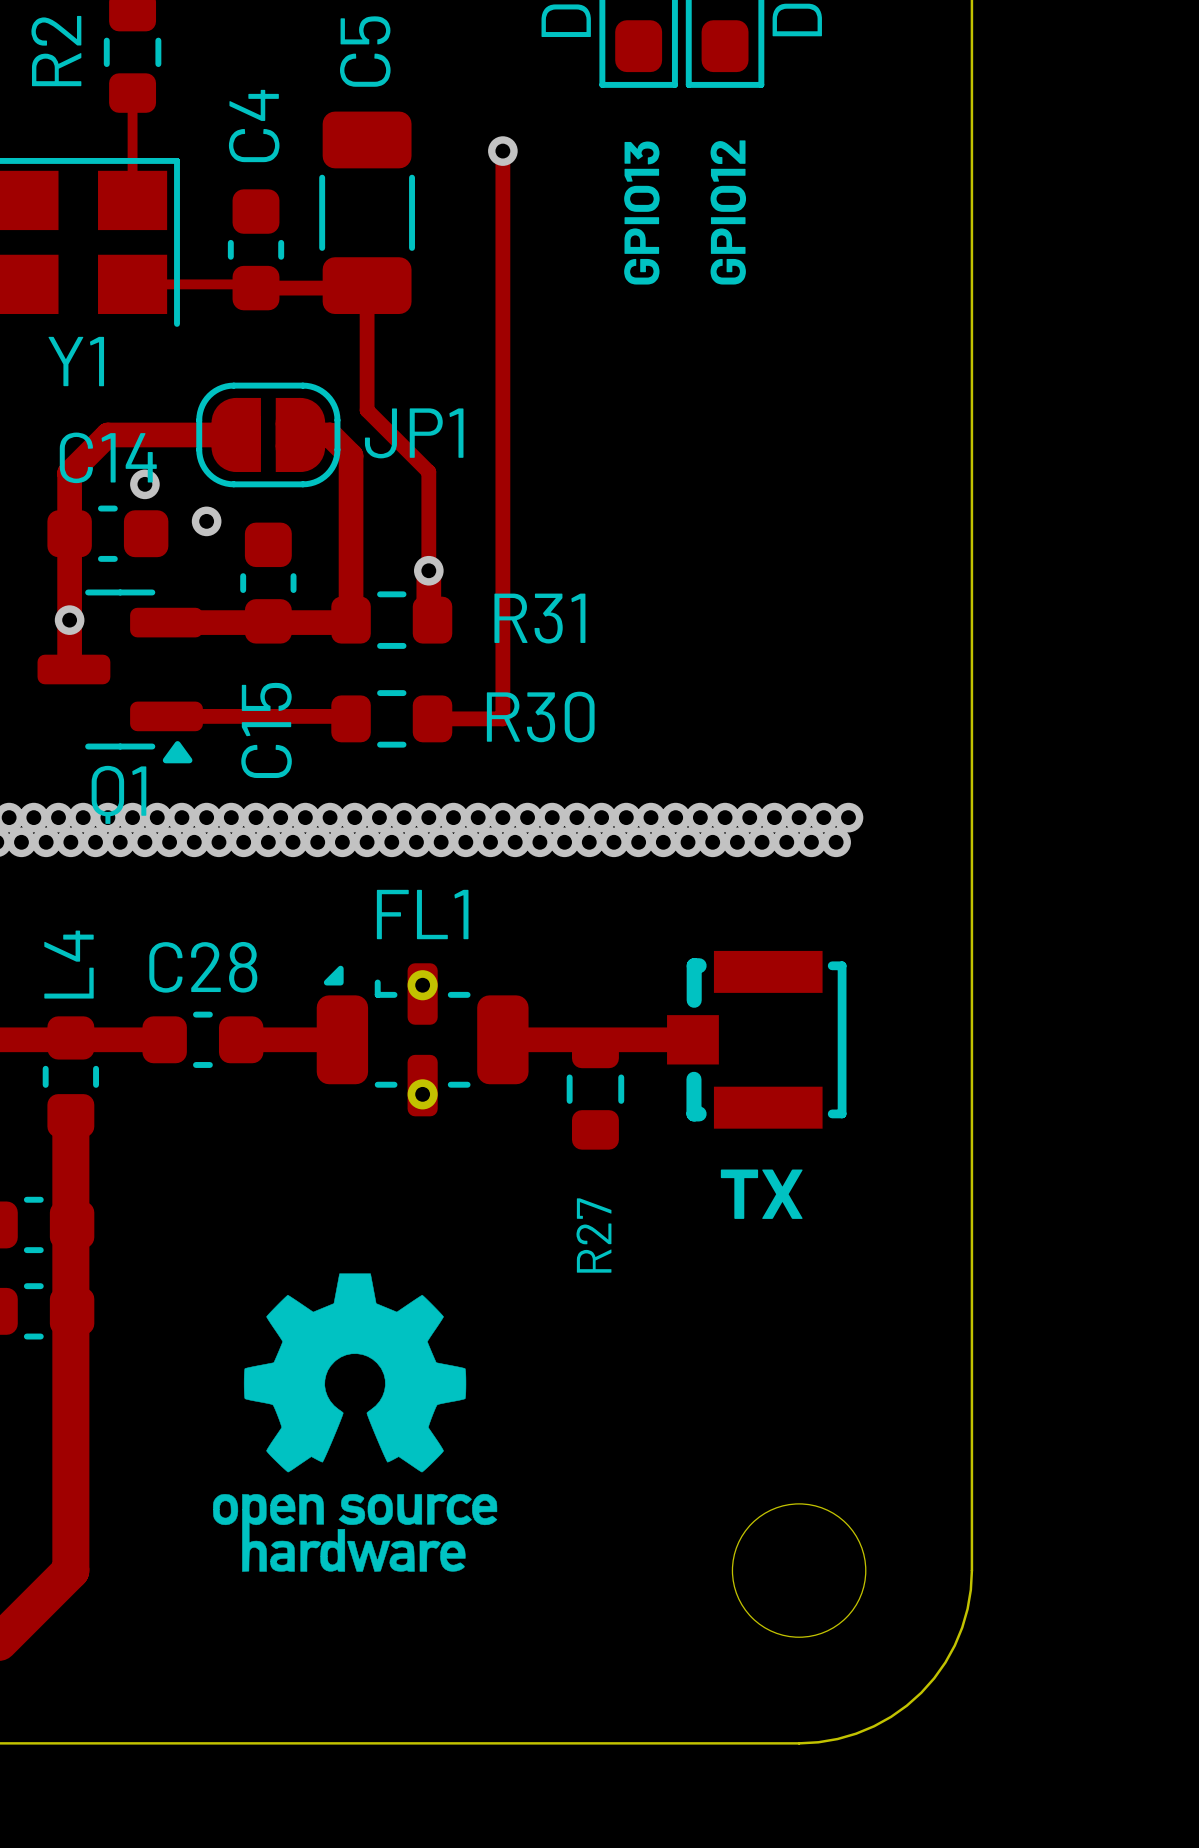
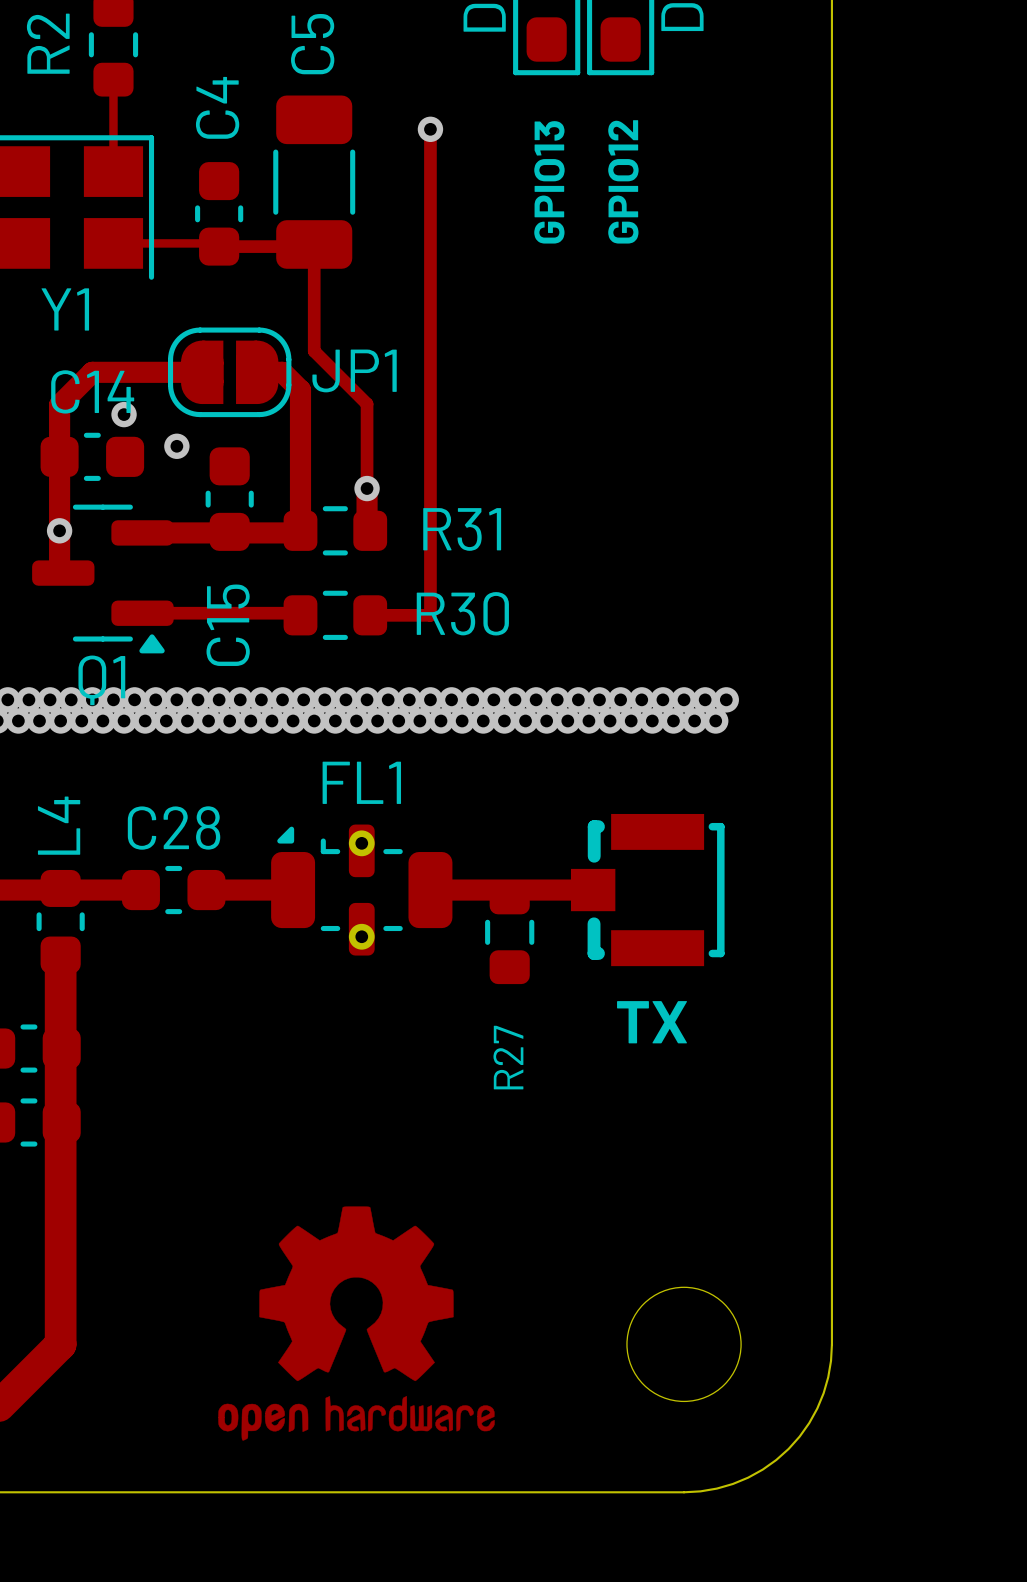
drawing: [212, 1273, 498, 1572] -> none
drawing: none -> [218, 1206, 495, 1441]

